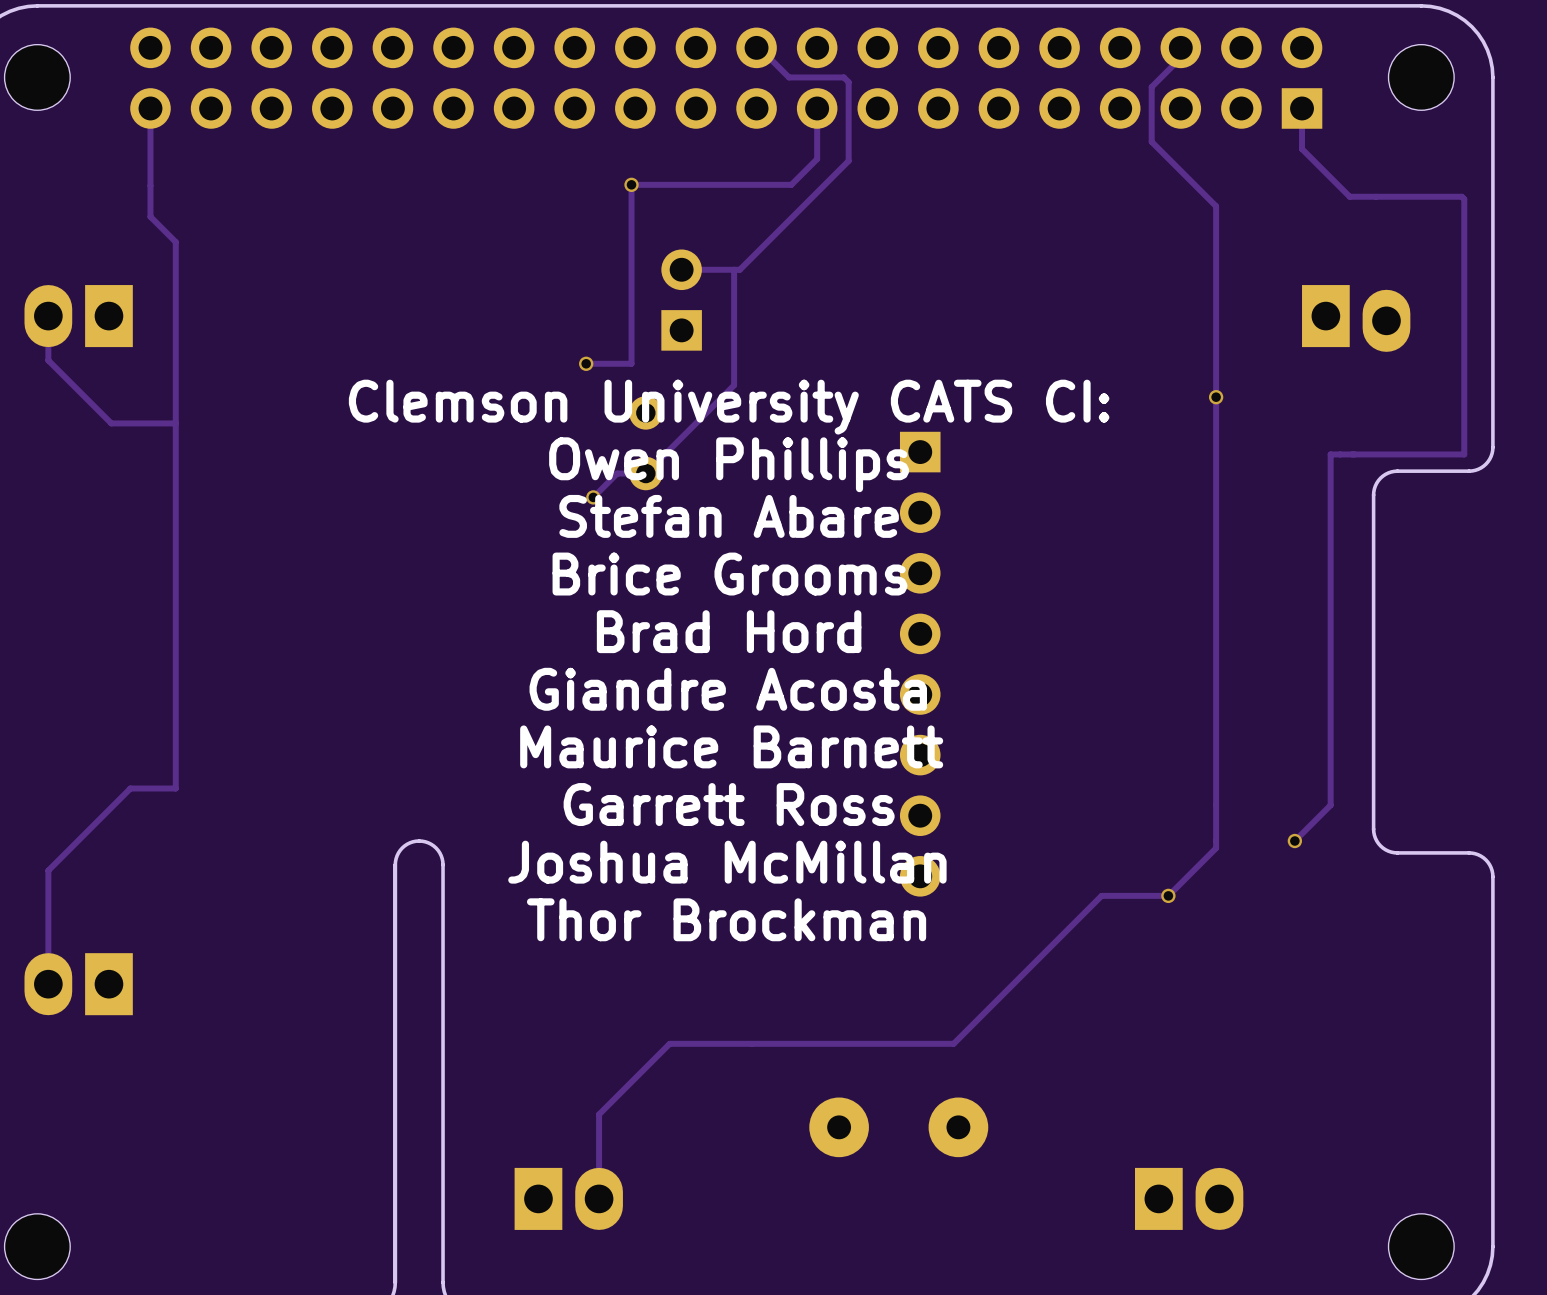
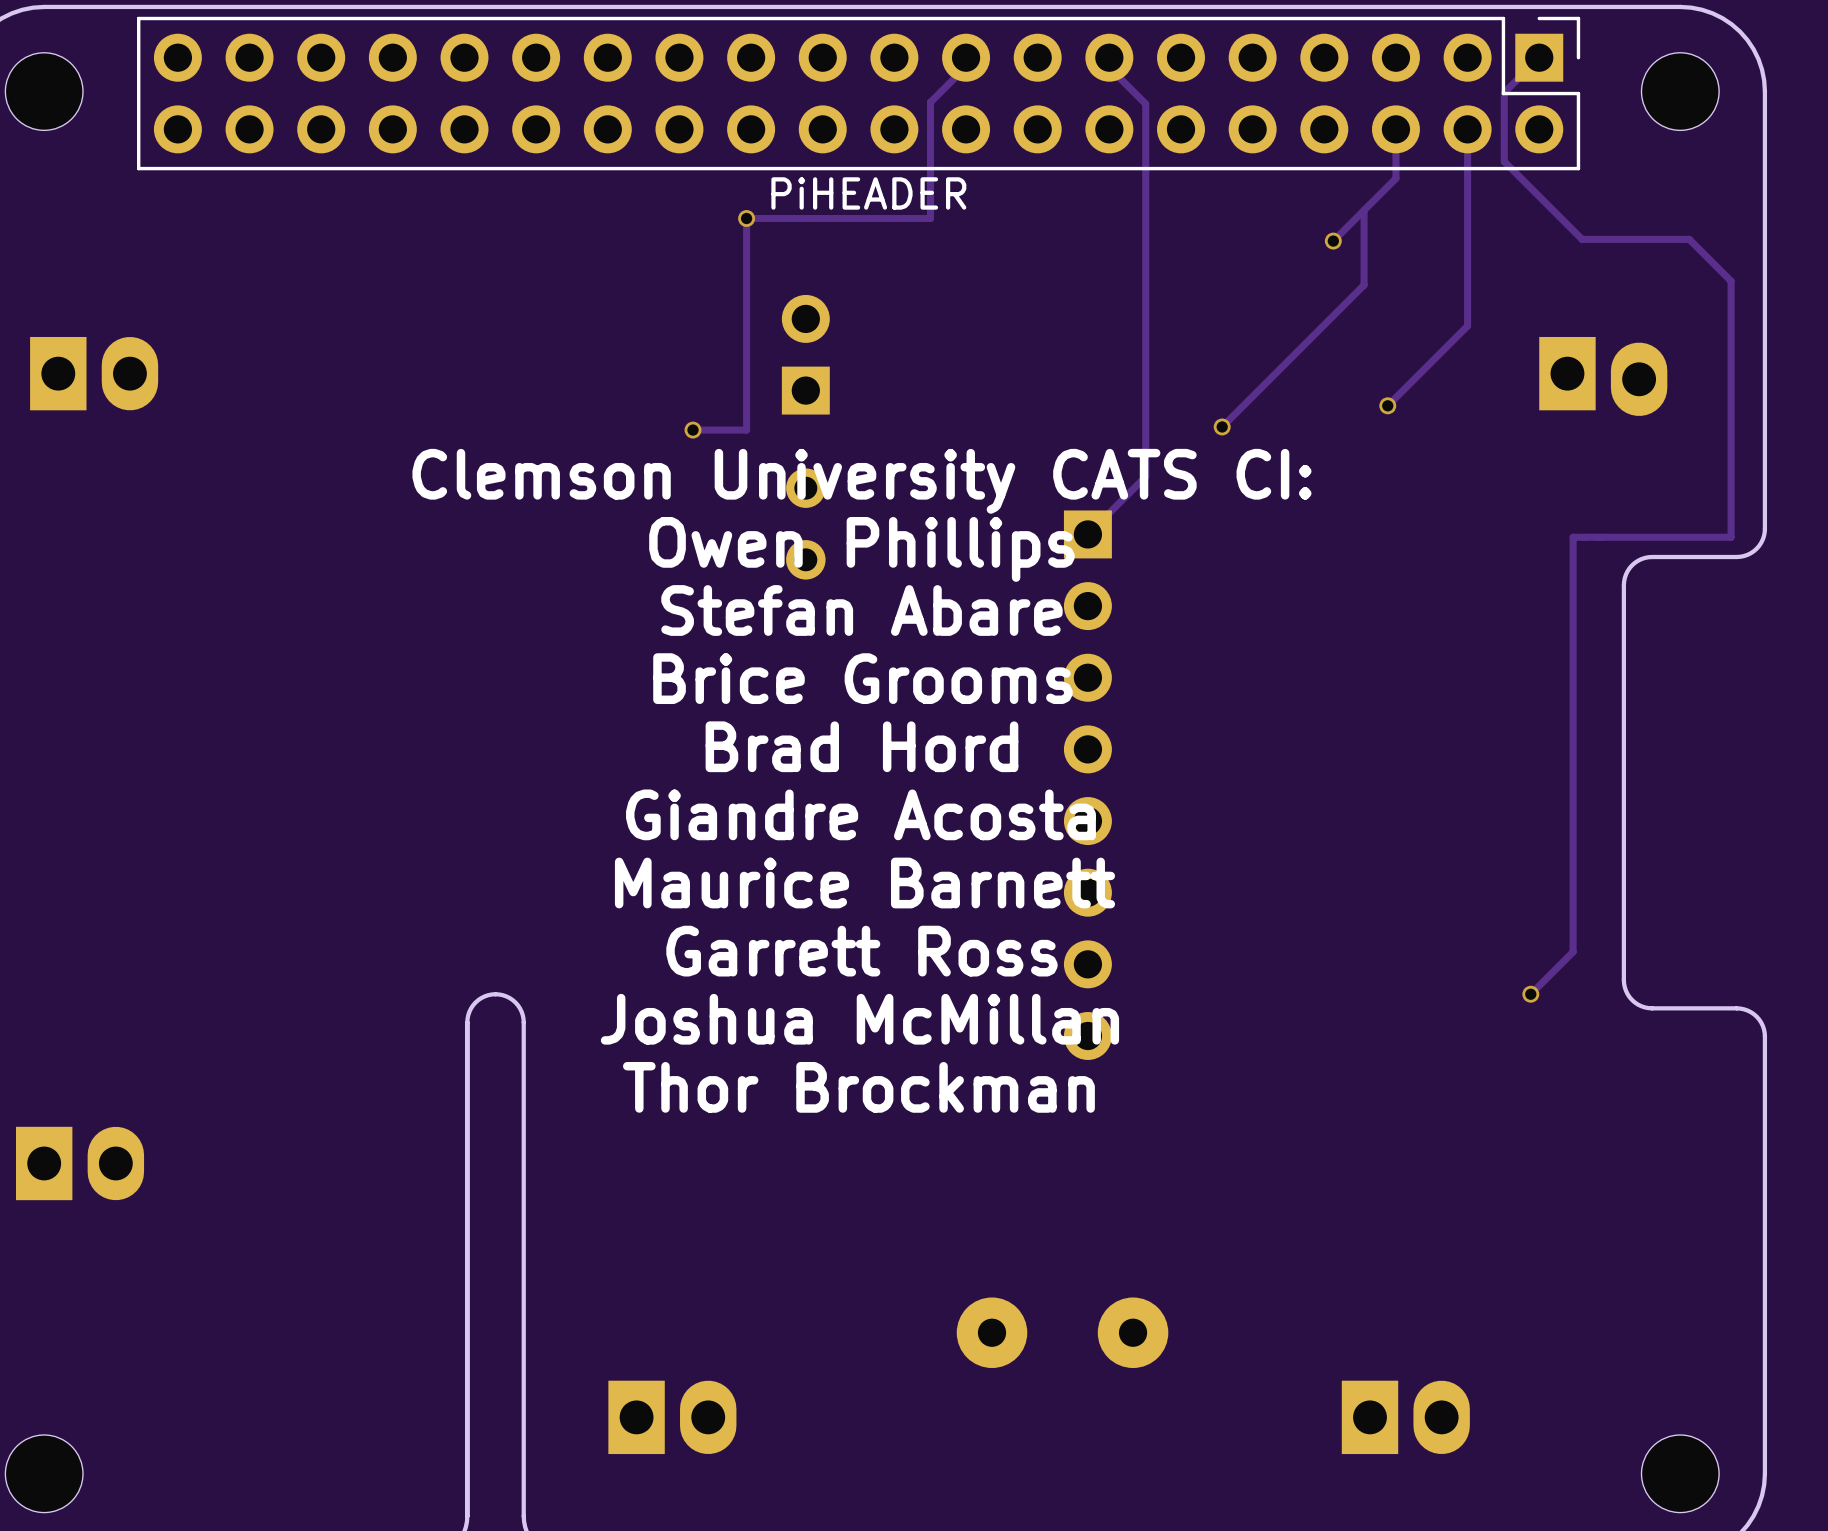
track: (759, 47) (789, 77) (843, 77) (848, 82) (848, 160) (739, 269) (681, 269) -> none
track: none -> (1109, 57) (1109, 67) (1145, 103) (1145, 476) (1087, 534)
track: (1180, 57) (1151, 86) (1151, 141) (1216, 206) (1216, 848) (1168, 895) (1101, 895) (953, 1043) (669, 1043) (599, 1114) (599, 1198) -> none
PiHEADER side: top (726, 78) -> bottom (858, 93)
track: (150, 108) (150, 216) (175, 242) (175, 788) (130, 788) (48, 870) (48, 984) -> none
track: (817, 108) (817, 159) (791, 184) (787, 184) -> (966, 57) (966, 66) (930, 102) (930, 218)
track: (1302, 108) (1302, 149) (1349, 196) (1461, 196) (1464, 199) (1464, 237) -> (1539, 57) (1504, 92) (1504, 161) (1582, 239) (1689, 239) (1731, 281)
track: none -> (1395, 129) (1395, 178) (1333, 241)
track: none -> (1467, 129) (1467, 325) (1387, 405)
track: none -> (1364, 210) (1364, 285) (1222, 426)
via: none -> (1333, 241)
track: (734, 269) (734, 385) (645, 473) (617, 473) (593, 497) -> none
track: (48, 316) (48, 360) (111, 423) (175, 423) -> none
part rotation: 0° (78, 316) -> 180° (94, 373)
via: none -> (1222, 426)
via position: (1216, 397) -> (1387, 405)
part position: (645, 443) -> (805, 524)
via: (593, 497) -> none
via: (1168, 895) -> none
part rotation: 0° (78, 984) -> 180° (80, 1163)

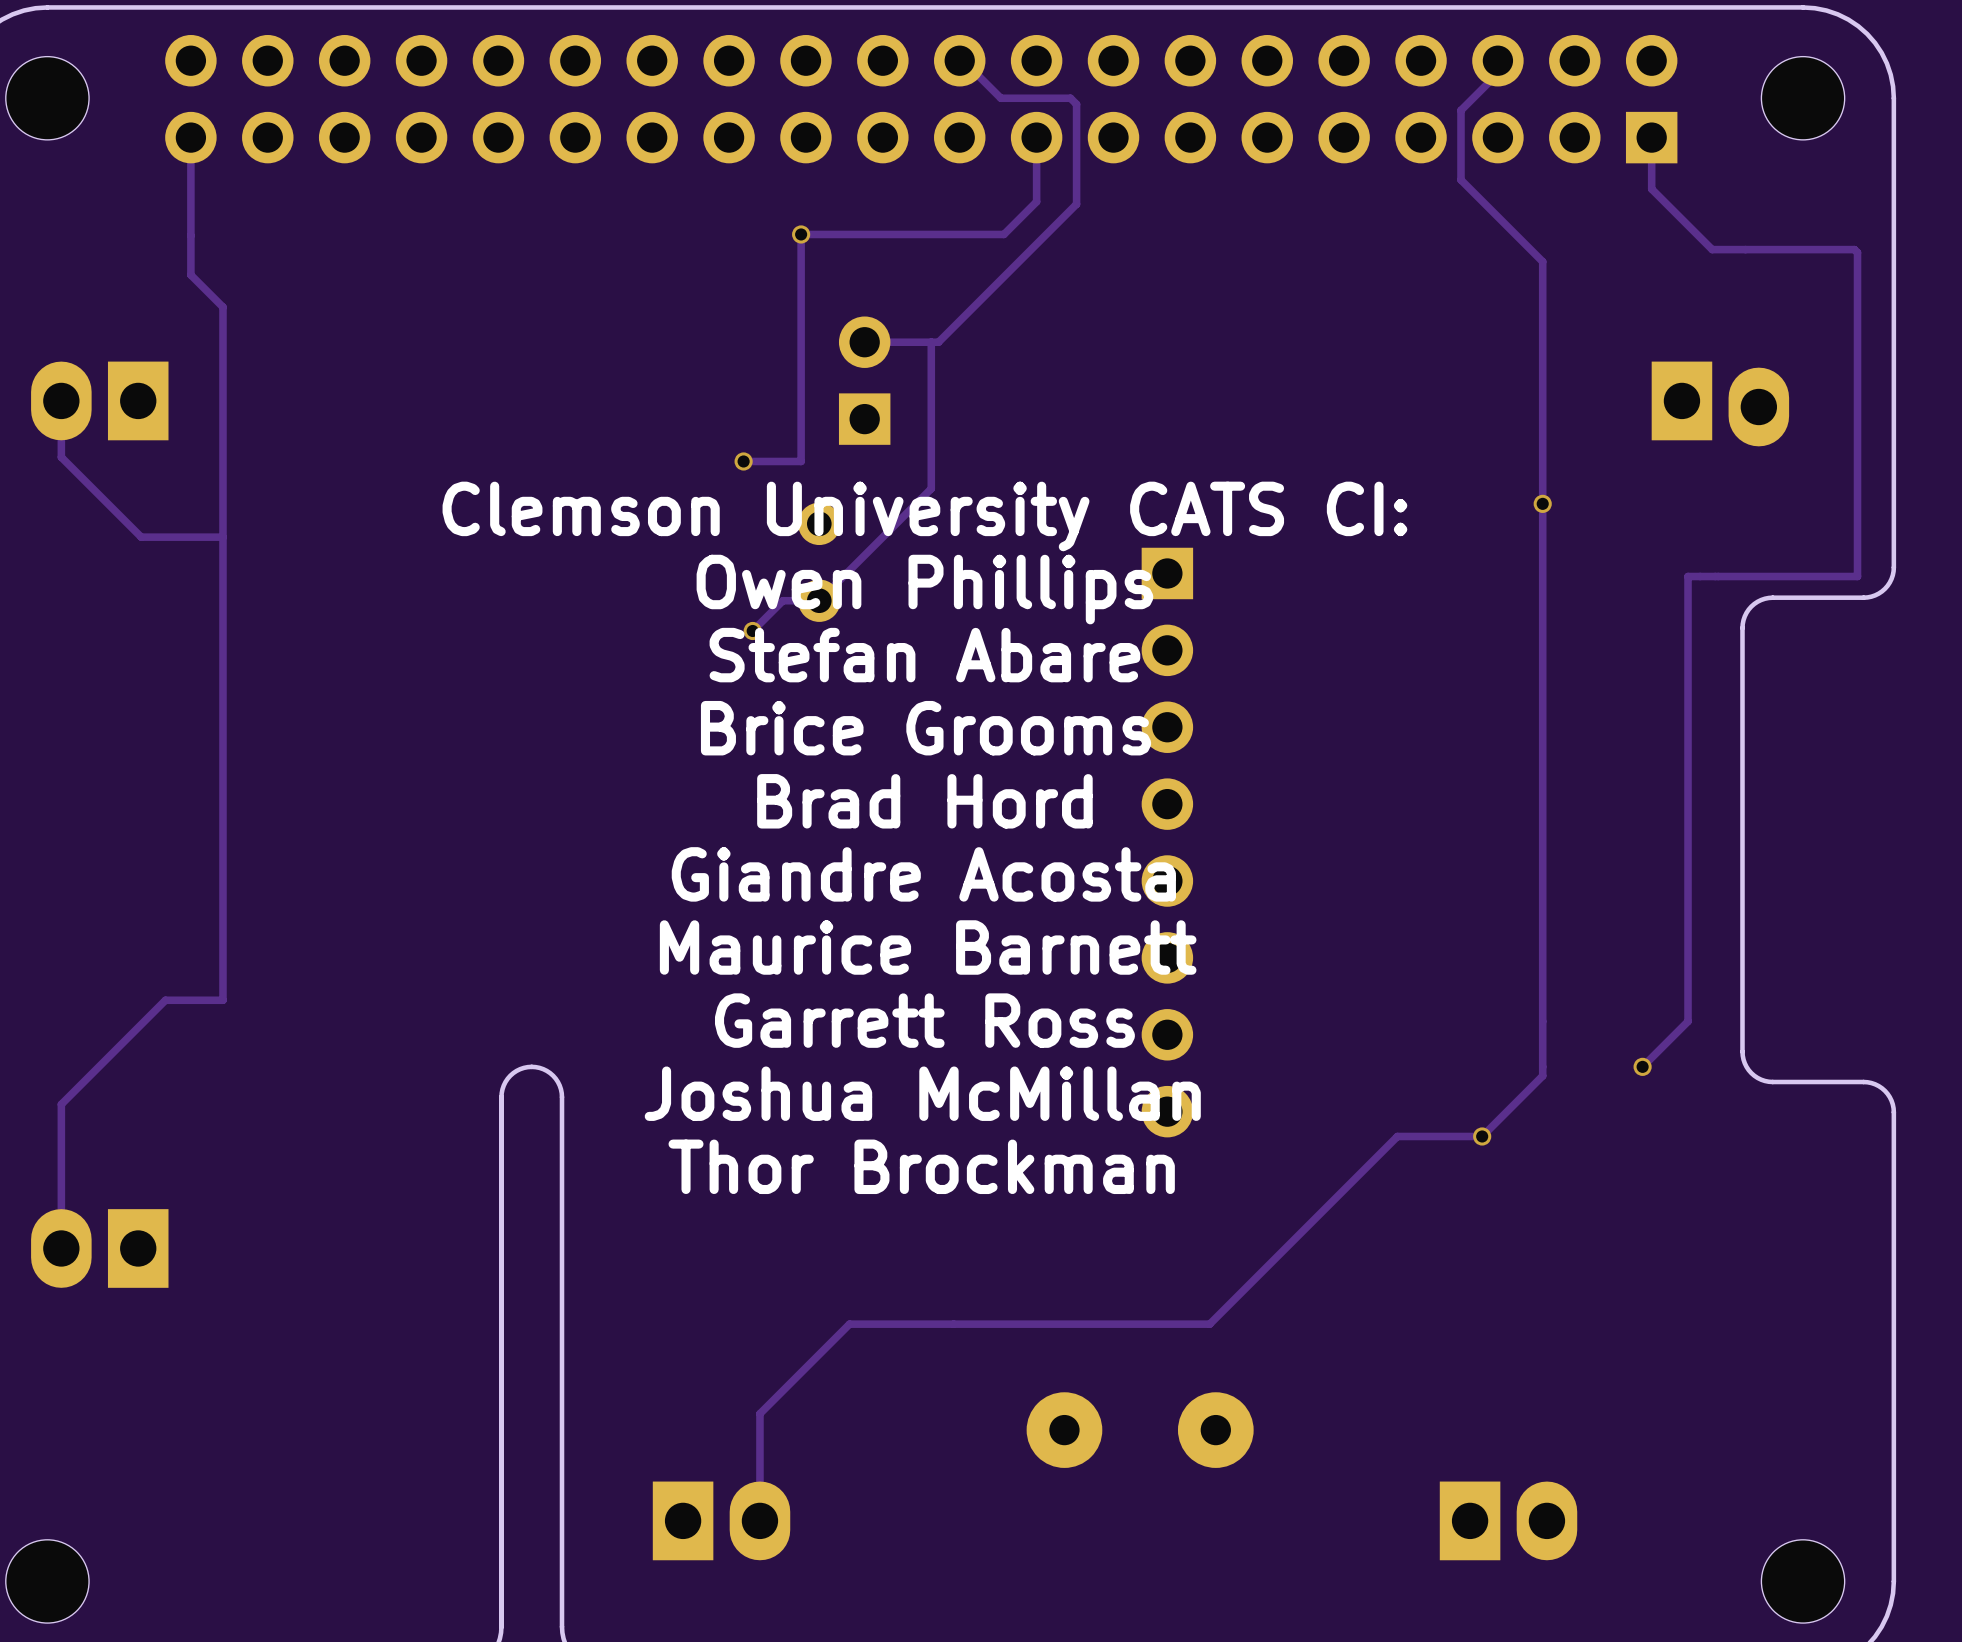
track: none -> (963, 60) (1000, 98) (1070, 98) (1076, 104) (1076, 204) (938, 342) (864, 342)
track: (966, 57) (966, 66) (930, 102) (930, 218) -> (1036, 137) (1036, 201) (1003, 234) (998, 234)
track: (1109, 57) (1109, 67) (1145, 103) (1145, 476) (1087, 534) -> none
track: (1539, 57) (1504, 92) (1504, 161) (1582, 239) (1689, 239) (1731, 281) -> (1651, 137) (1651, 189) (1712, 249) (1854, 249) (1857, 252) (1857, 301)
track: none -> (1497, 73) (1460, 110) (1460, 179) (1542, 261) (1542, 1075) (1482, 1136) (1397, 1136) (1209, 1324) (849, 1324) (759, 1413) (759, 1520)
PiHEADER side: bottom (858, 93) -> top (921, 99)
track: none -> (190, 137) (190, 275) (222, 307) (222, 1000) (165, 1000) (61, 1104) (61, 1248)
track: (1395, 129) (1395, 178) (1333, 241) -> none
track: (1467, 129) (1467, 325) (1387, 405) -> none
track: (1364, 210) (1364, 285) (1222, 426) -> none
via: (1333, 241) -> none
track: none -> (931, 342) (931, 488) (819, 600) (782, 600) (752, 630)
track: none -> (61, 400) (61, 457) (141, 537) (222, 537)
part rotation: 0° (94, 373) -> 180° (99, 400)
via position: (1387, 405) -> (1542, 503)
via: (1222, 426) -> none
part position: (805, 524) -> (819, 562)
via: none -> (752, 630)
via: none -> (1482, 1136)
part rotation: 0° (80, 1163) -> 180° (99, 1248)

